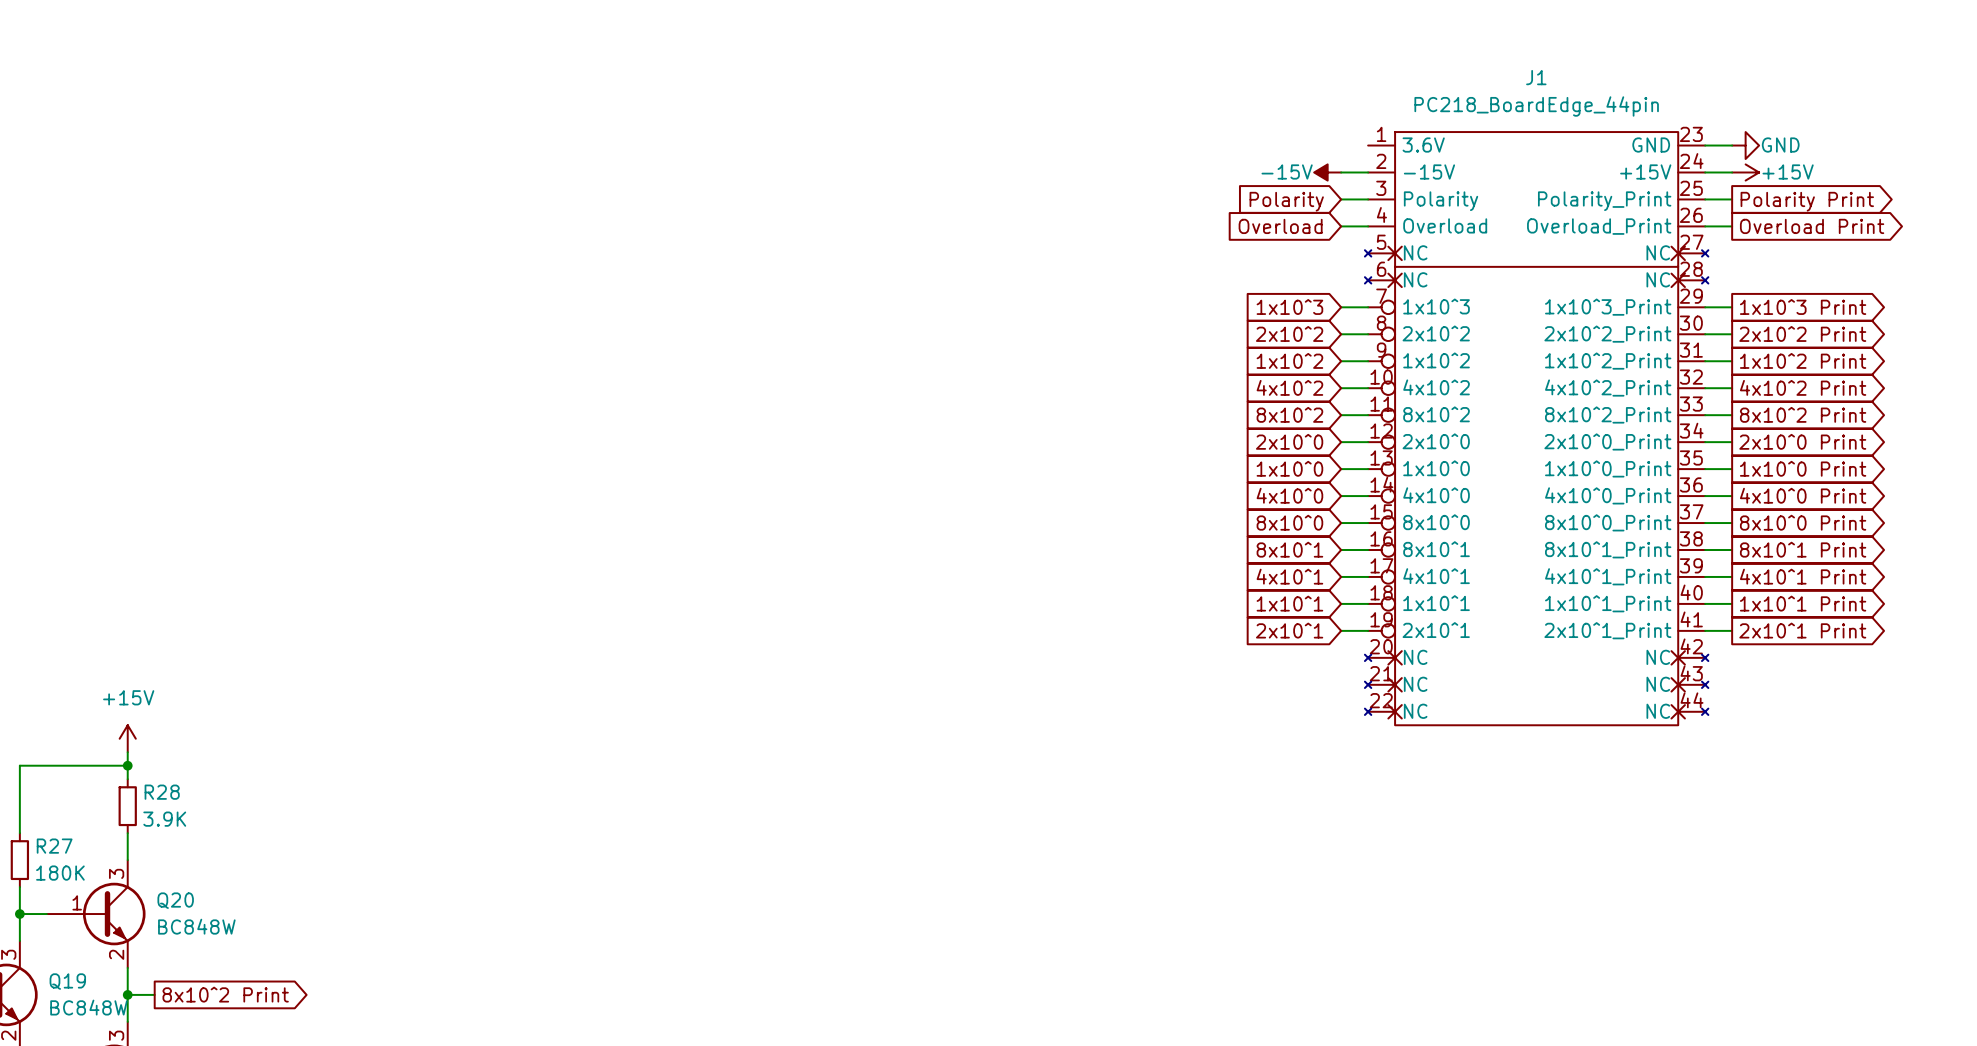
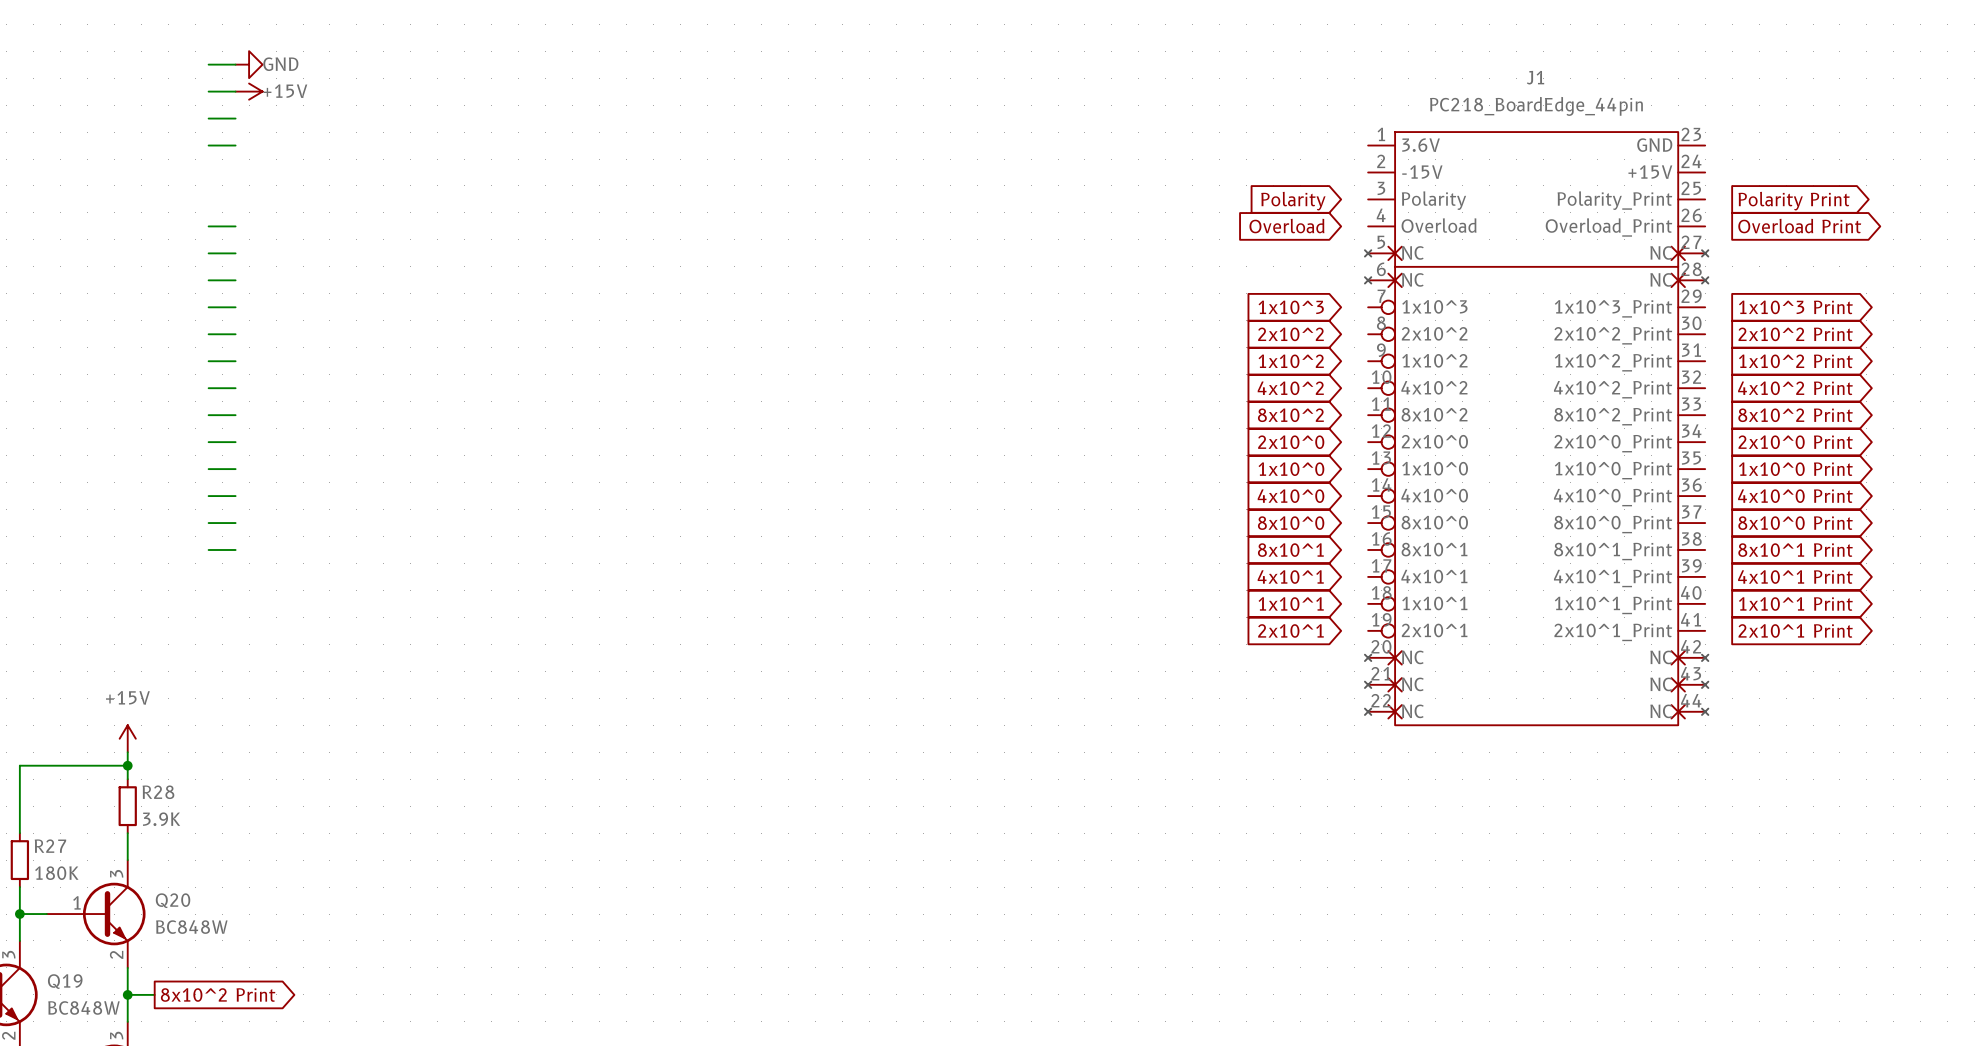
wire: none -> (208, 64) (235, 64)
power symbol: none -> GND (249, 64)
wire: none -> (208, 91) (235, 91)
power symbol: none -> +15V (249, 91)
wire: none -> (208, 118) (235, 118)
wire: none -> (208, 145) (235, 145)
wire: (1705, 145) (1732, 145) -> none
power symbol: GND (1745, 145) -> none
power symbol: -15V (1327, 172) -> none
wire: (1341, 172) (1368, 172) -> none
wire: (1705, 172) (1732, 172) -> none
power symbol: +15V (1745, 172) -> none
wire: (1341, 199) (1368, 199) -> none
wire: (1705, 199) (1732, 199) -> none
wire: none -> (208, 226) (235, 226)
wire: (1341, 226) (1368, 226) -> none
wire: (1705, 226) (1732, 226) -> none
wire: none -> (208, 253) (235, 253)
wire: none -> (208, 280) (235, 280)
wire: none -> (208, 307) (235, 307)
wire: (1341, 307) (1368, 307) -> none
wire: (1705, 307) (1732, 307) -> none
wire: none -> (208, 334) (235, 334)
wire: (1341, 334) (1368, 334) -> none
wire: (1705, 334) (1732, 334) -> none
wire: none -> (208, 361) (235, 361)
wire: (1341, 361) (1368, 361) -> none
wire: (1705, 361) (1732, 361) -> none
wire: none -> (208, 388) (235, 388)
wire: (1341, 388) (1368, 388) -> none
wire: (1705, 388) (1732, 388) -> none
wire: none -> (208, 415) (235, 415)
wire: (1341, 415) (1368, 415) -> none
wire: (1705, 415) (1732, 415) -> none
wire: none -> (208, 442) (235, 442)
wire: (1341, 442) (1368, 442) -> none
wire: (1705, 442) (1732, 442) -> none
wire: none -> (208, 469) (235, 469)
wire: (1341, 469) (1368, 469) -> none
wire: (1705, 469) (1732, 469) -> none
wire: none -> (208, 496) (235, 496)
wire: (1341, 496) (1368, 496) -> none
wire: (1705, 496) (1732, 496) -> none
wire: none -> (208, 523) (235, 523)
wire: (1341, 523) (1368, 523) -> none
wire: (1705, 523) (1732, 523) -> none
wire: none -> (208, 549) (235, 549)
wire: (1341, 549) (1368, 549) -> none
wire: (1705, 549) (1732, 549) -> none
wire: (1341, 576) (1368, 576) -> none
wire: (1705, 576) (1732, 576) -> none
wire: (1341, 603) (1368, 603) -> none
wire: (1705, 603) (1732, 603) -> none
wire: (1341, 630) (1368, 630) -> none
wire: (1705, 630) (1732, 630) -> none

